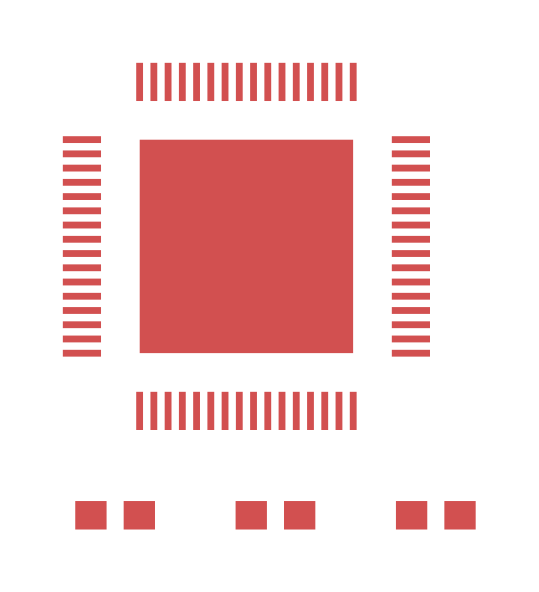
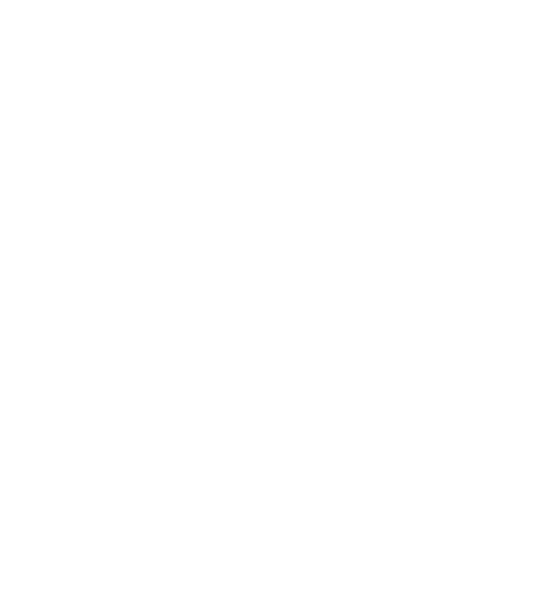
part: (246, 246) -> none
part: (115, 515) -> none
part: (275, 515) -> none
part: (435, 515) -> none

